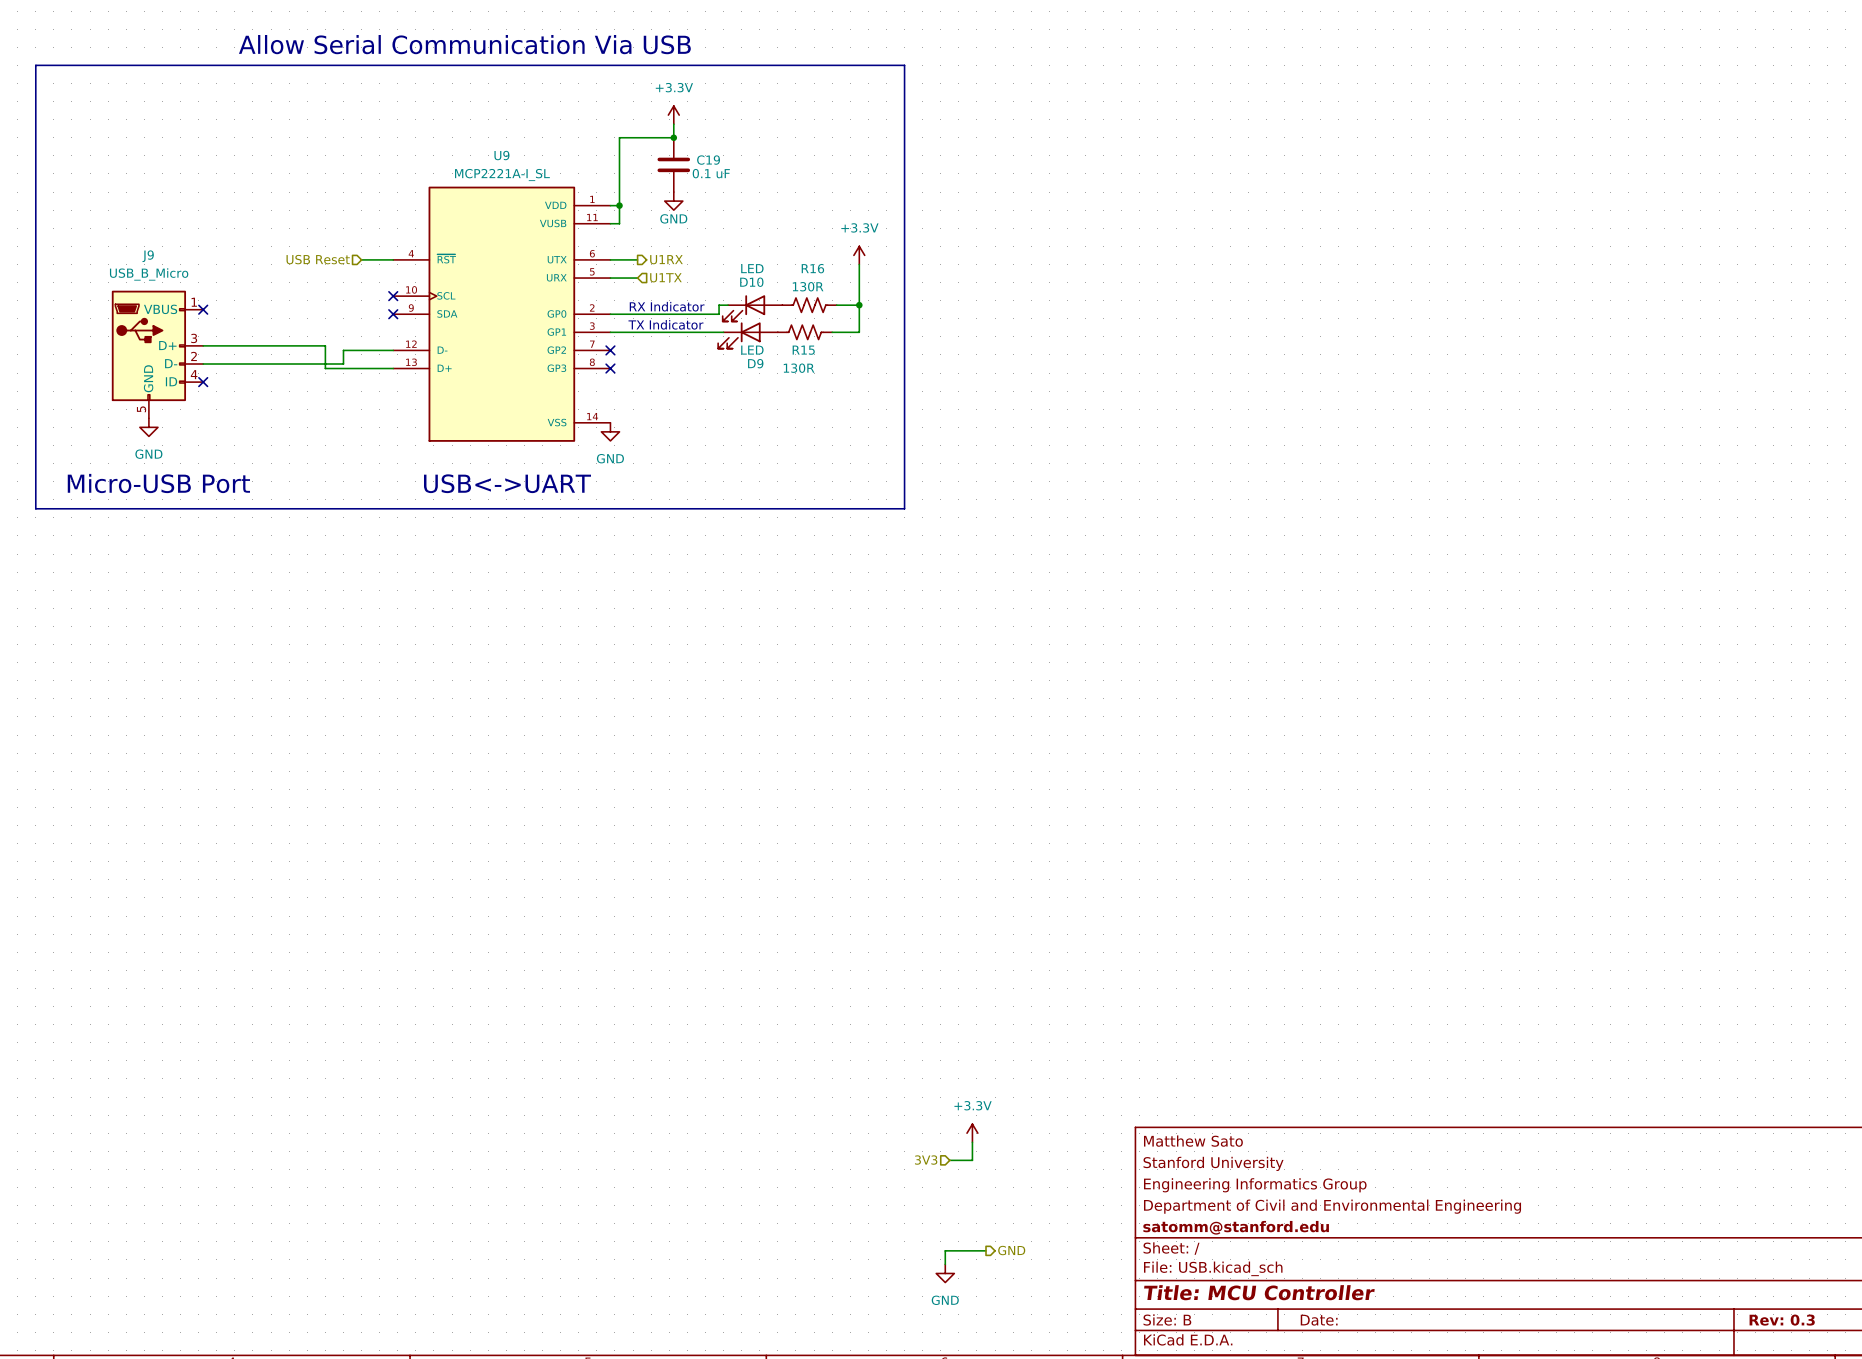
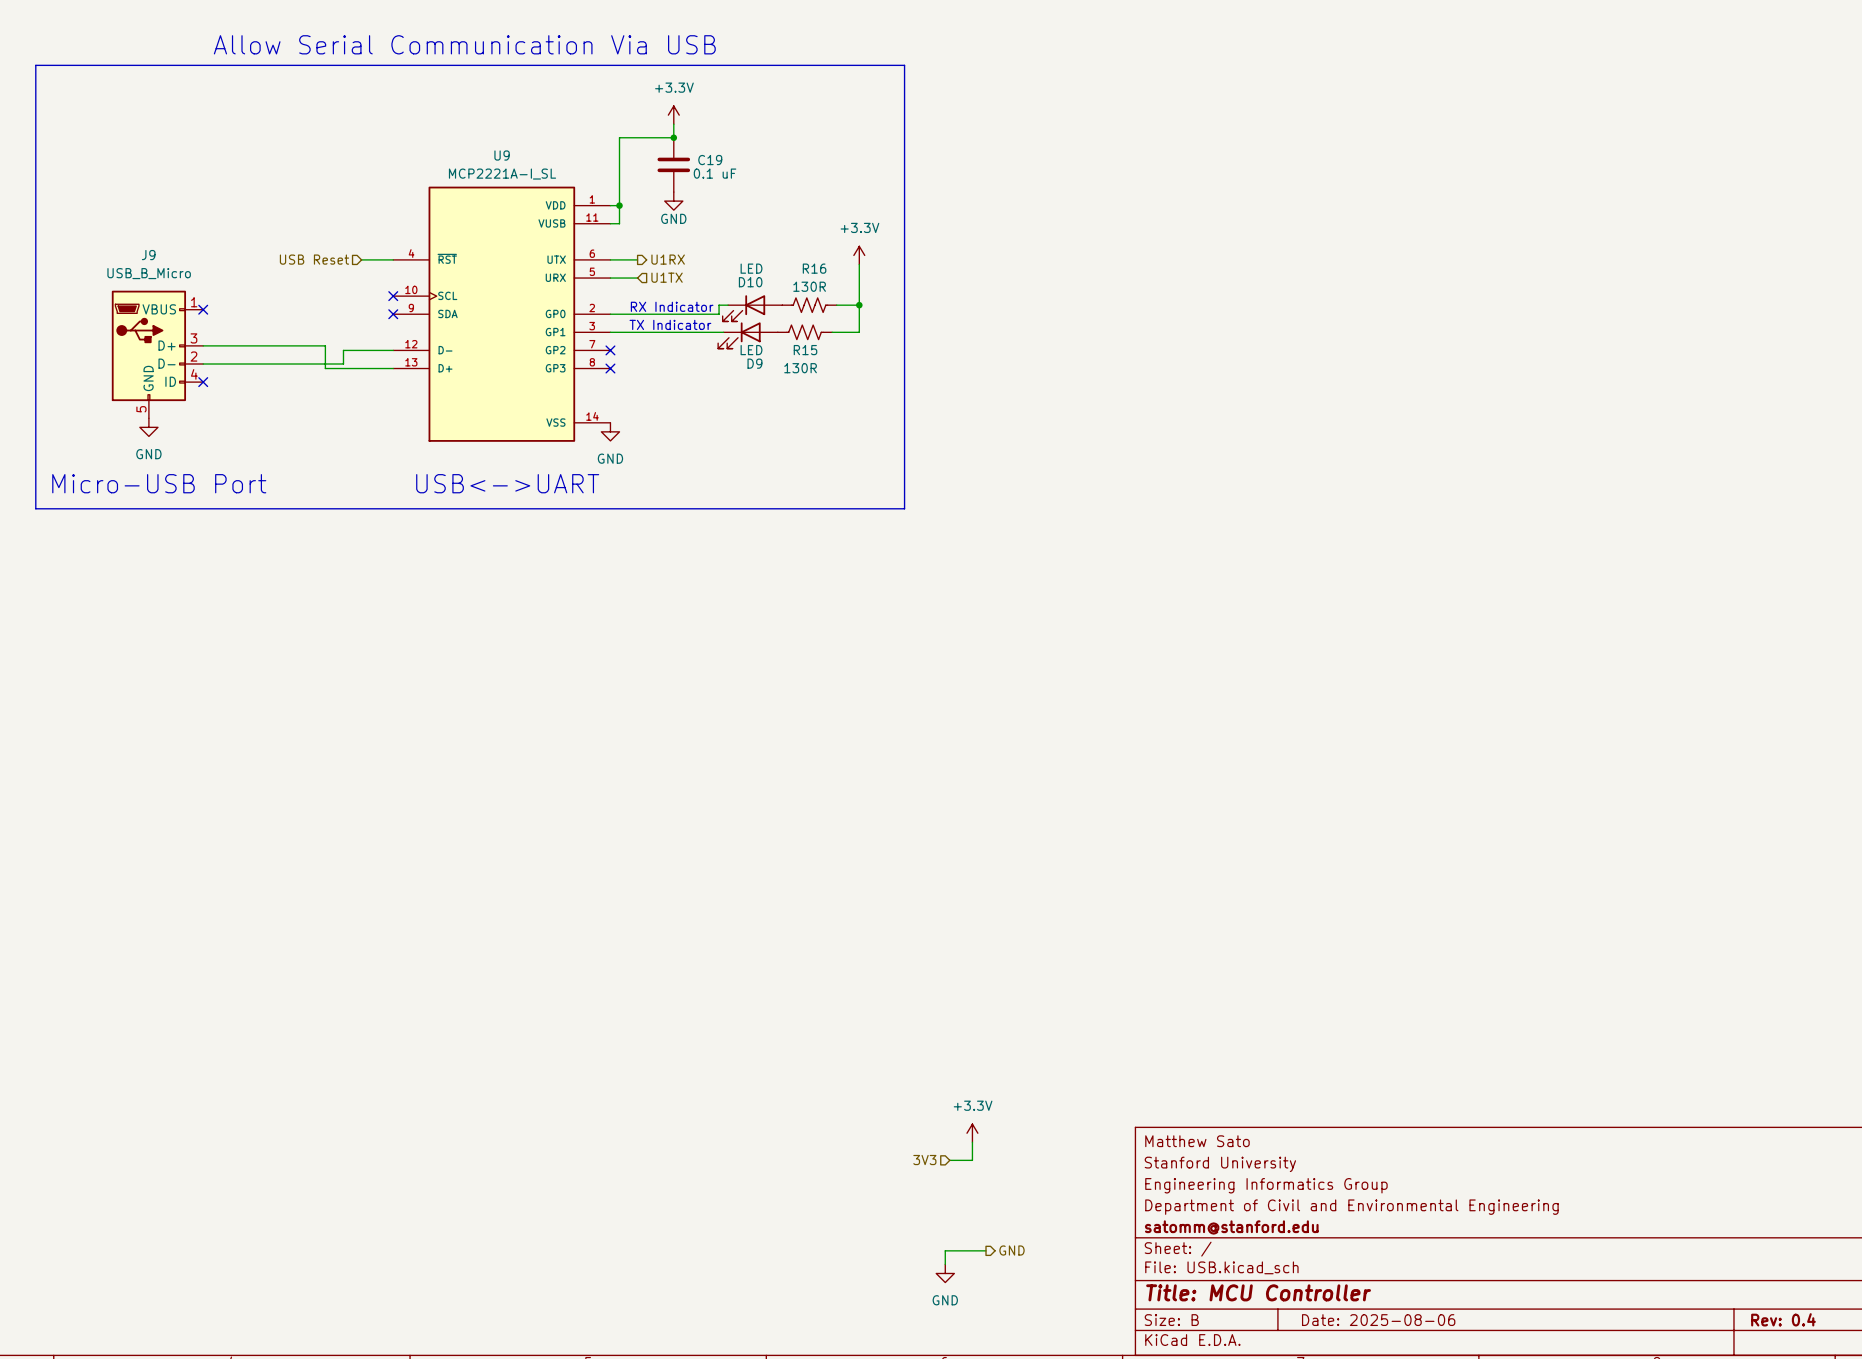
title block: Date: (1319, 1320) -> Date: 2025-08-06 (1378, 1320)
title block: Rev: 0.3 (1782, 1320) -> Rev: 0.4 (1783, 1319)

